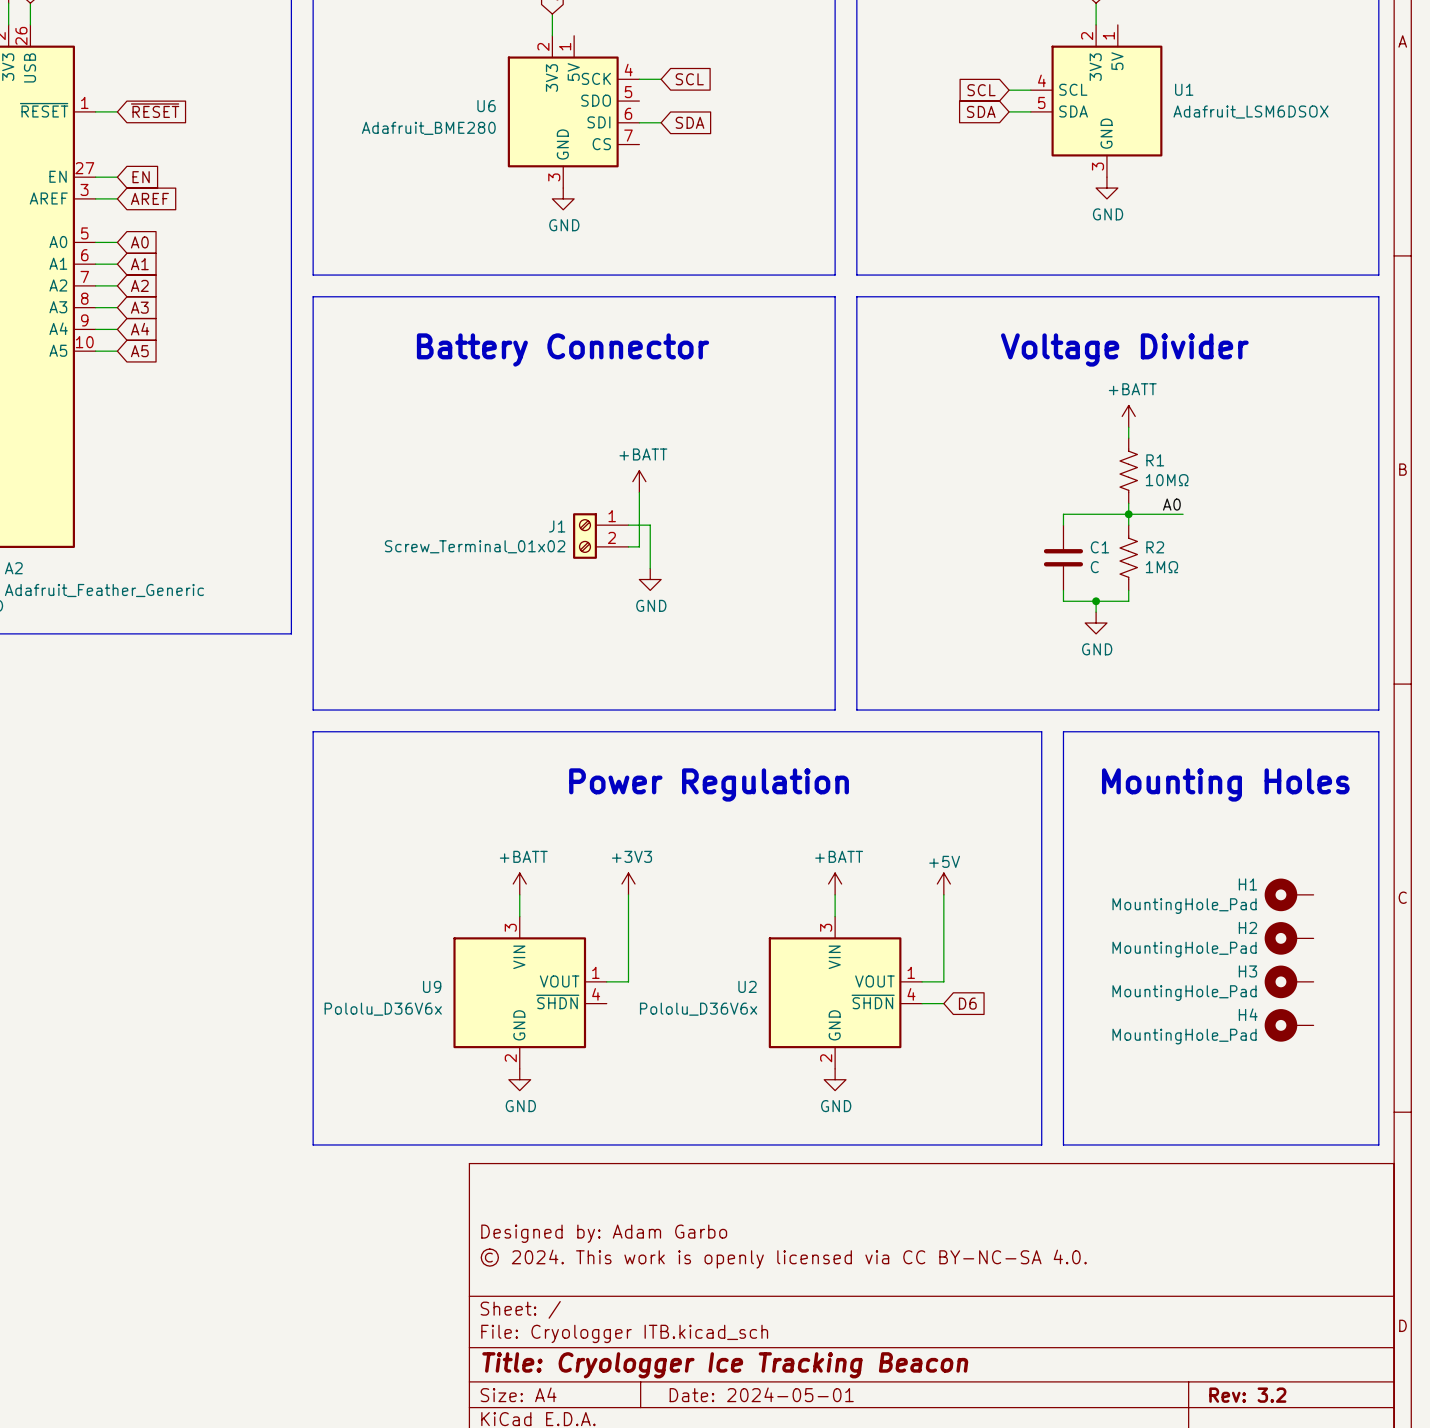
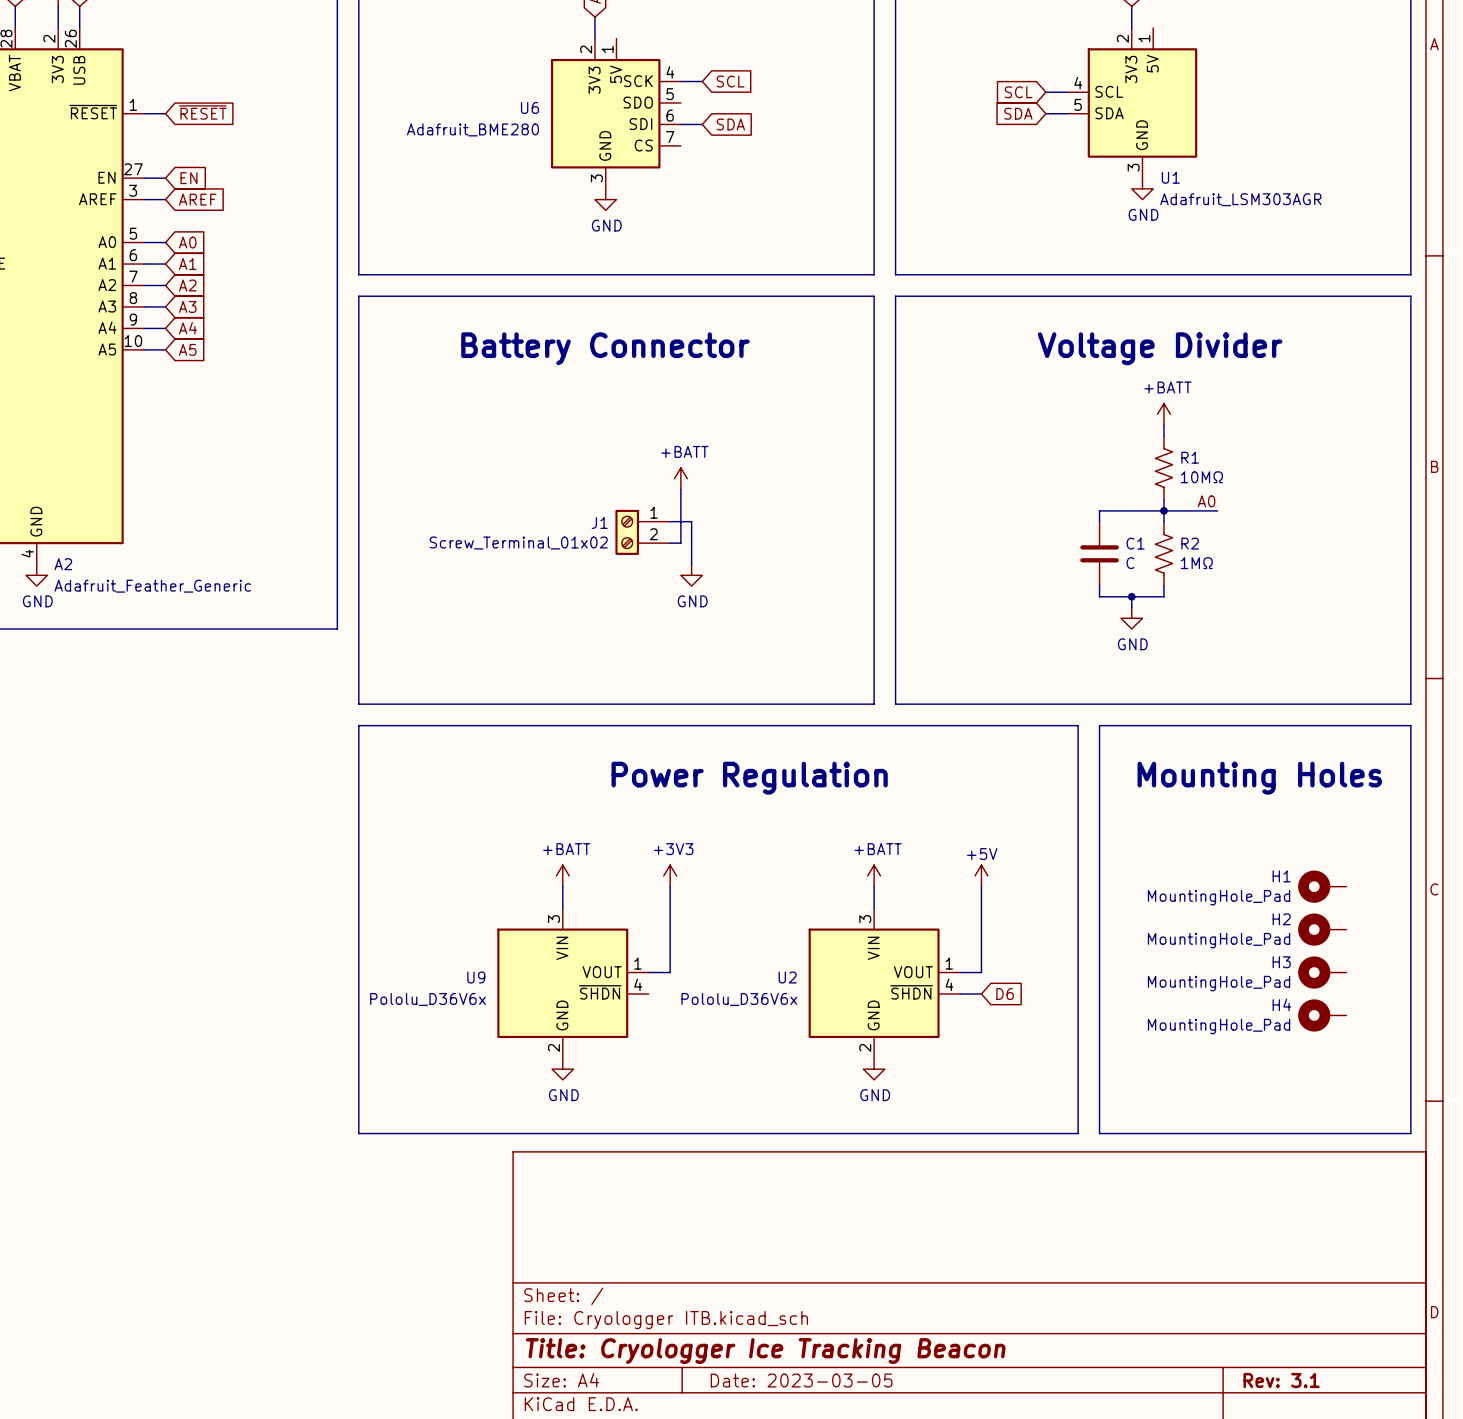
U1 name position: U1 (1184, 89) -> U1 (1170, 177)
U1 value: Adafruit_LSM6DSOX (1251, 112) -> Adafruit_LSM303AGR (1240, 199)
title block: Designed by: Adam Garbo (604, 1233) -> none
title block: © 2024. This work is openly licensed via CC BY-NC-SA 4.0. (783, 1258) -> none
title block: Date: 2024-05-01 (761, 1394) -> Date: 2023-03-05 (801, 1380)
title block: Rev: 3.2 (1247, 1395) -> Rev: 3.1 (1281, 1380)

